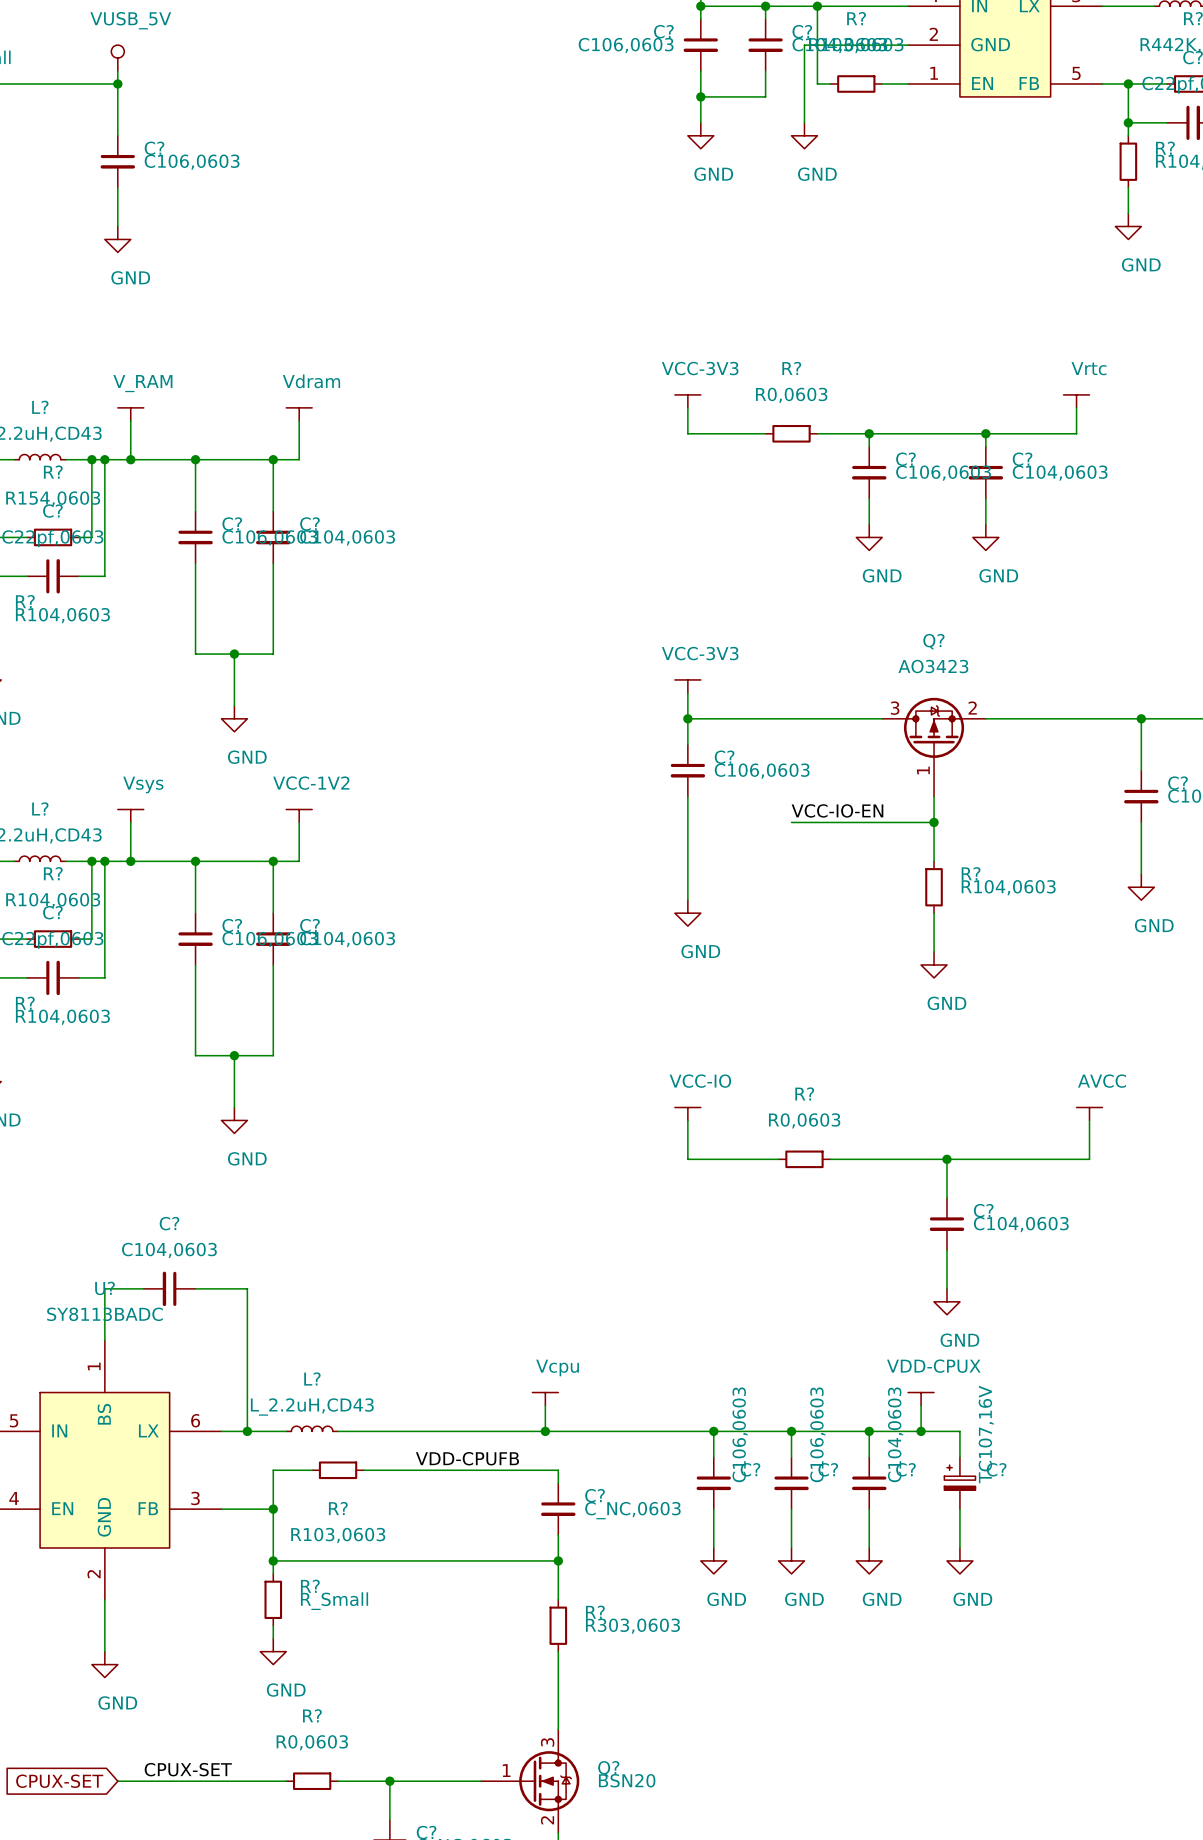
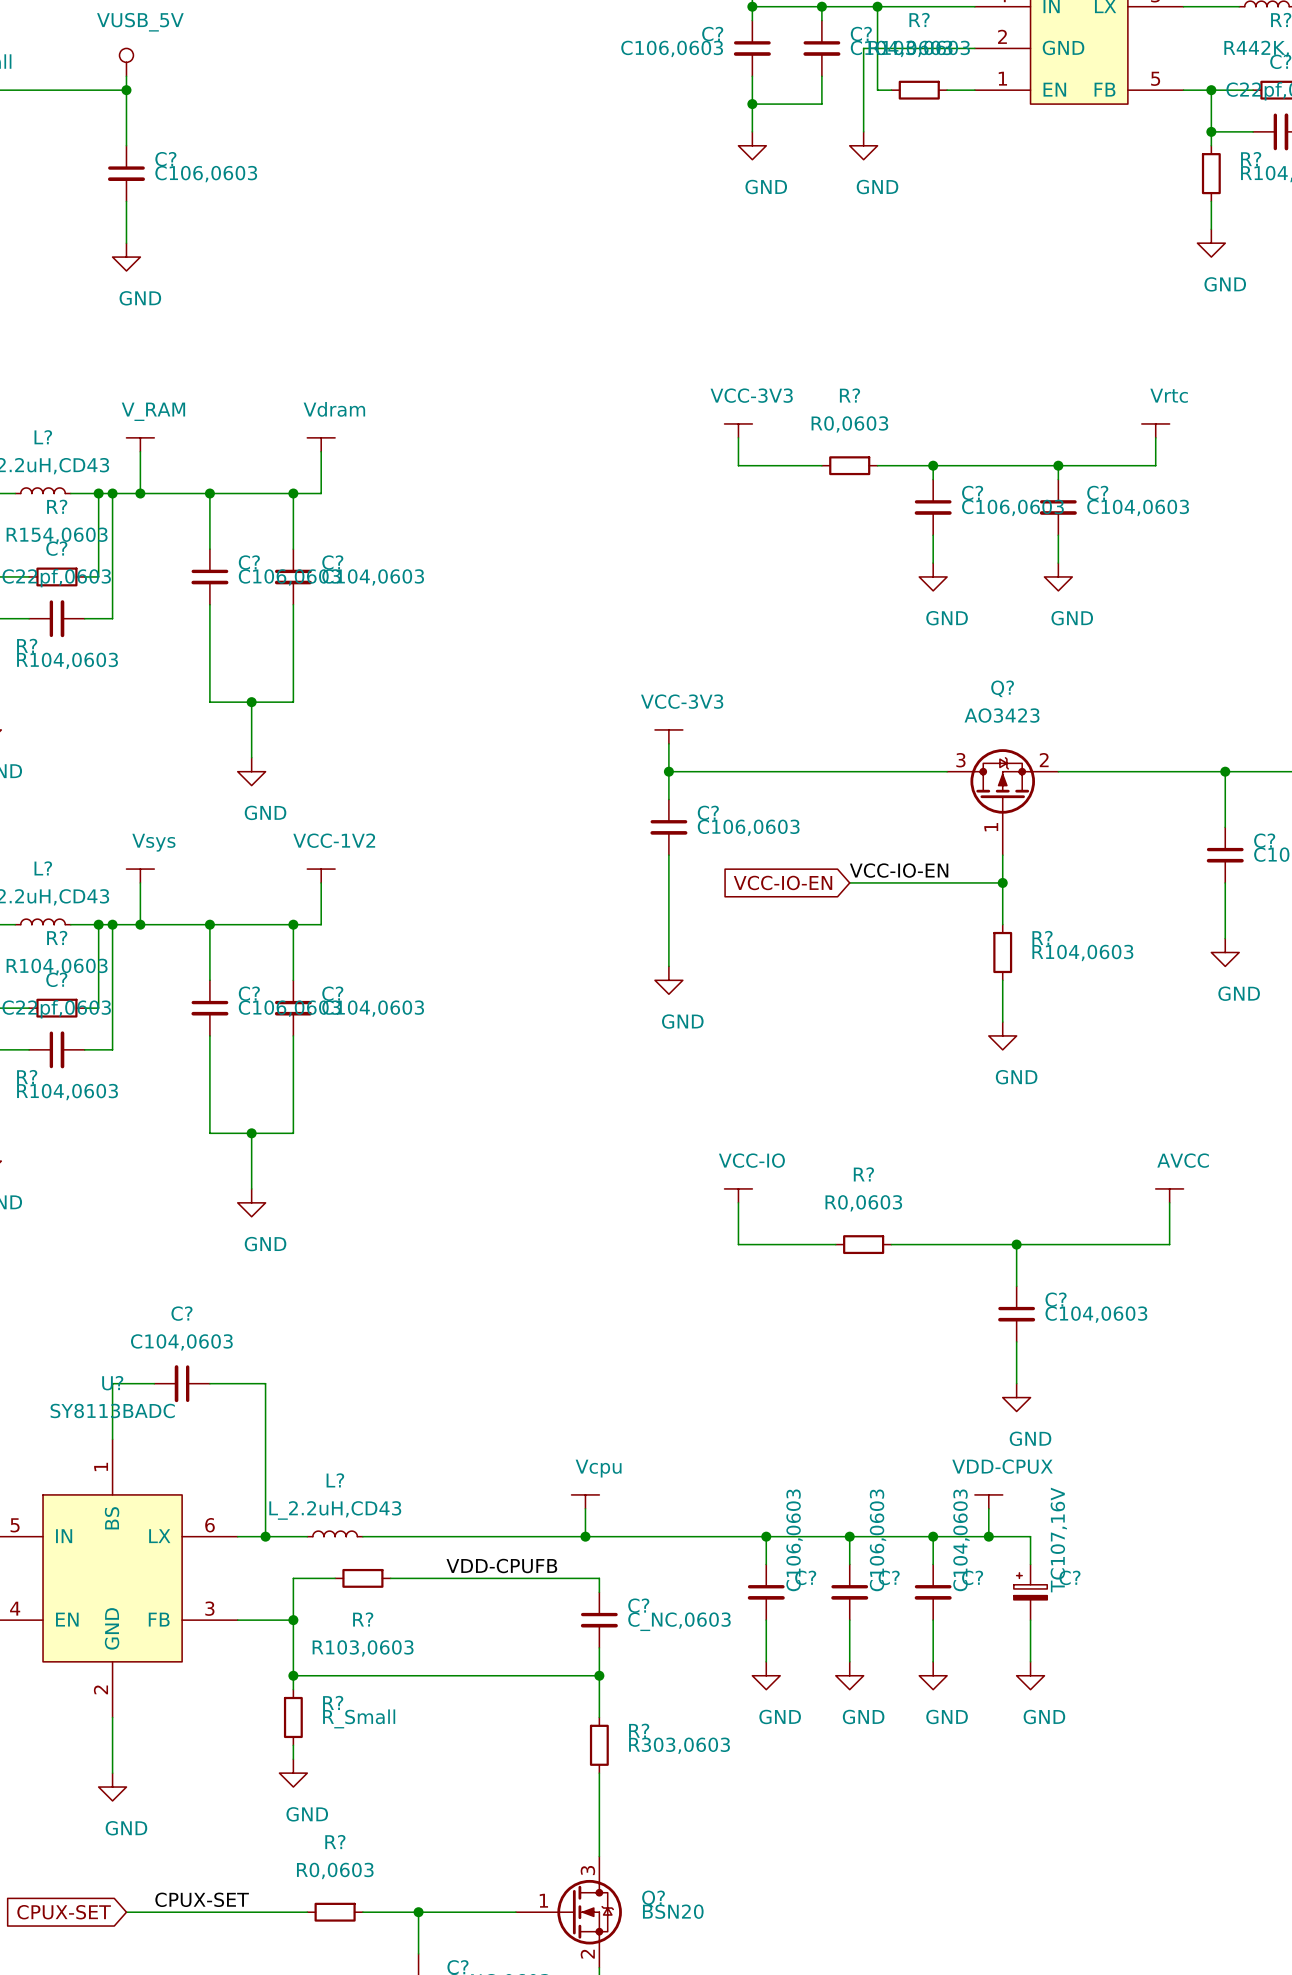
power symbol position: VCC-3V3 (687, 686) -> VCC-3V3 (668, 736)
wire: (687, 692) (687, 744) -> (668, 743) (668, 799)
wire: none -> (668, 771) (738, 771)
junction: none -> (668, 771)
junction: (687, 718) -> none
C? position: (687, 770) -> (668, 827)
wire: (687, 796) (687, 900) -> (668, 855) (668, 966)
global label: none -> VCC-IO-EN (783, 882)
power symbol position: GND (687, 913) -> GND (668, 980)

